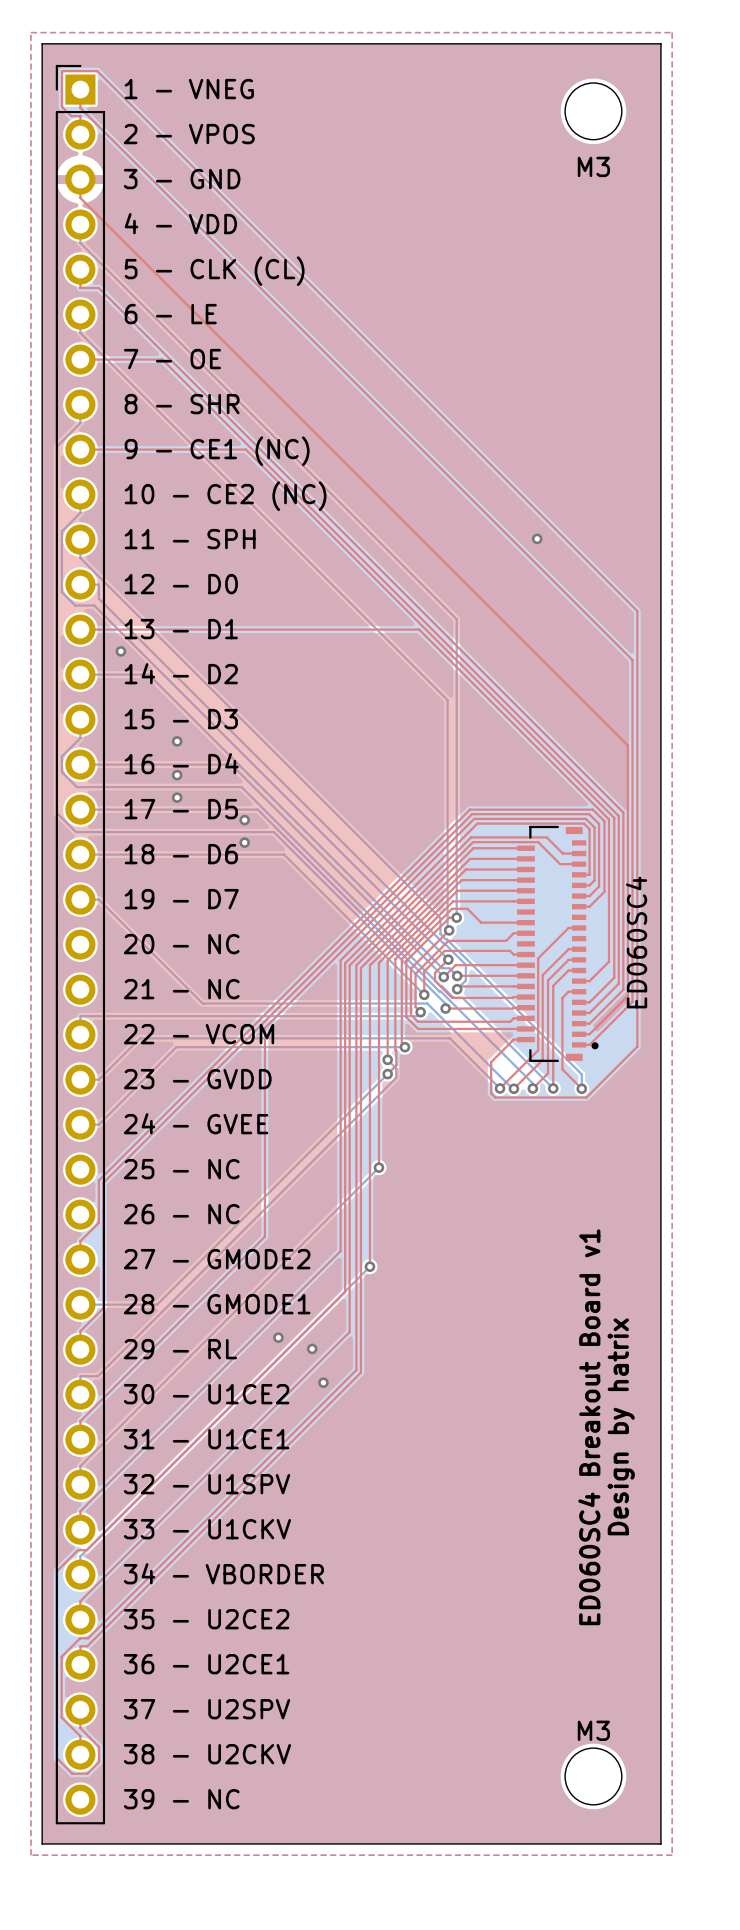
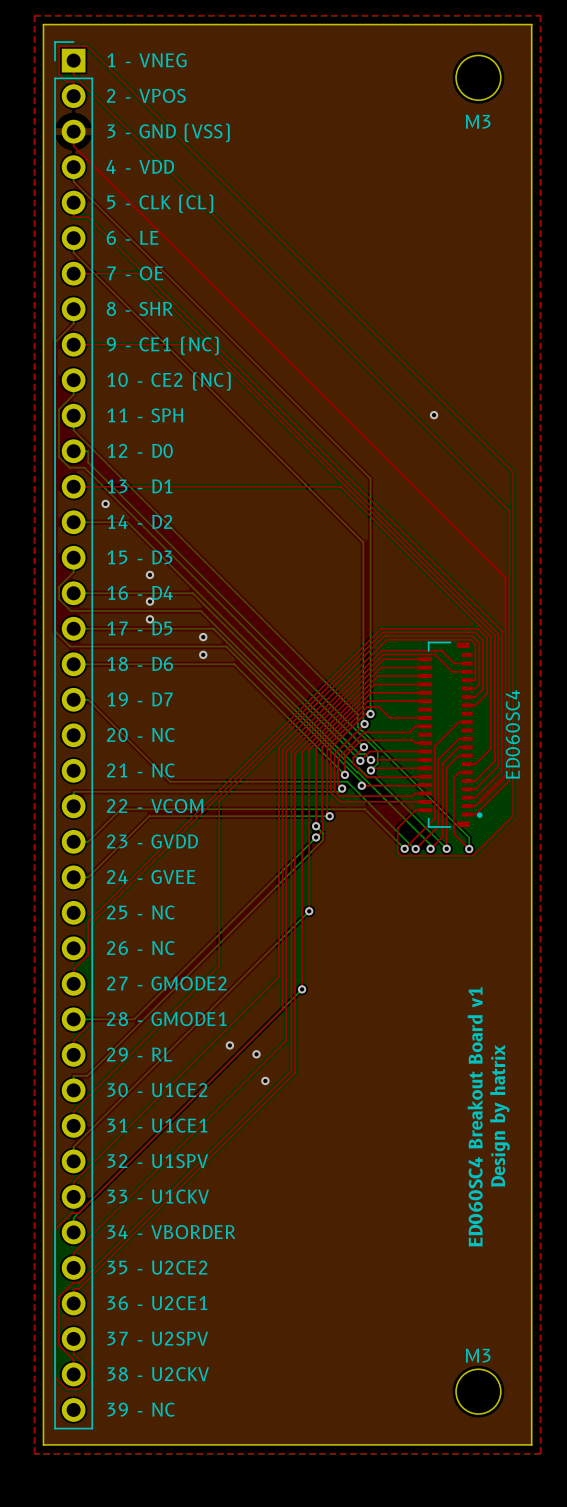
text: 3 - GND (182, 179) -> 3 - GND (VSS) (168, 132)

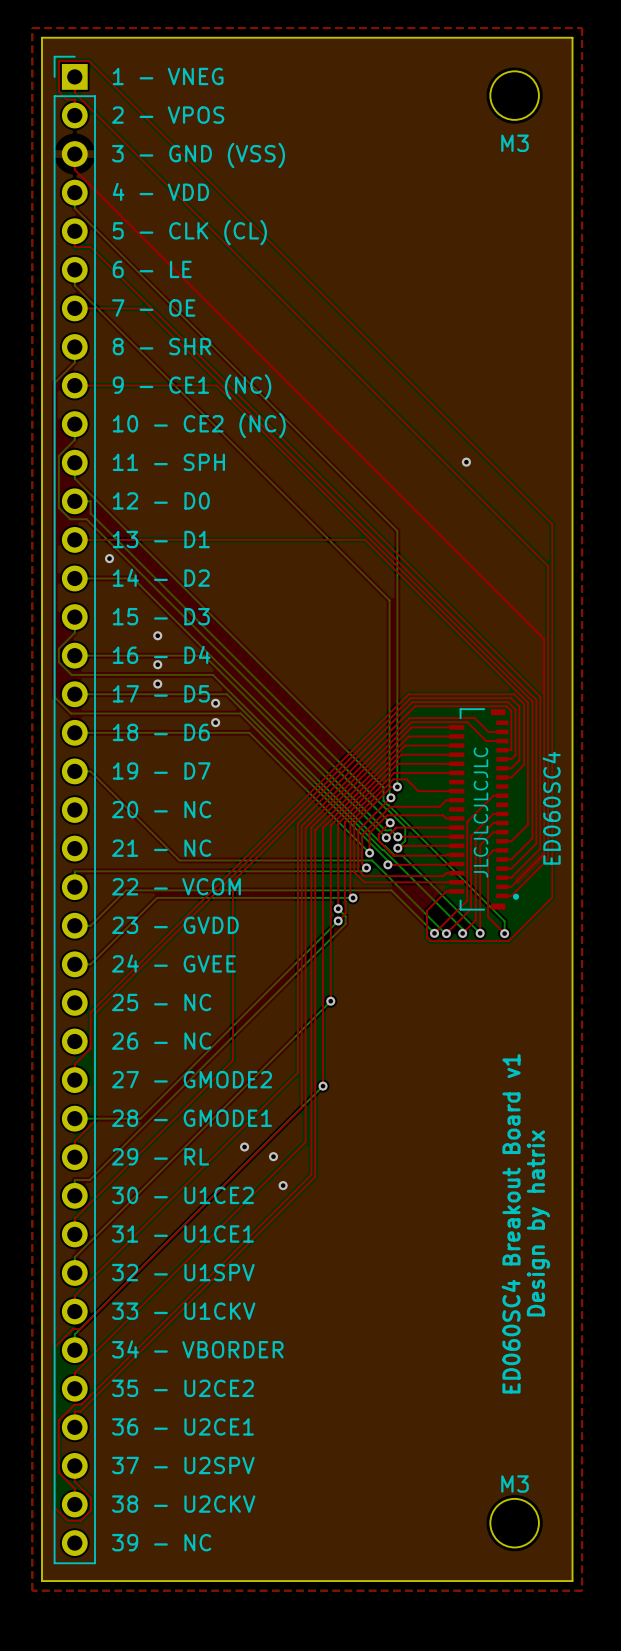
text: none -> JLCJLCJLCJLC (480, 812)

